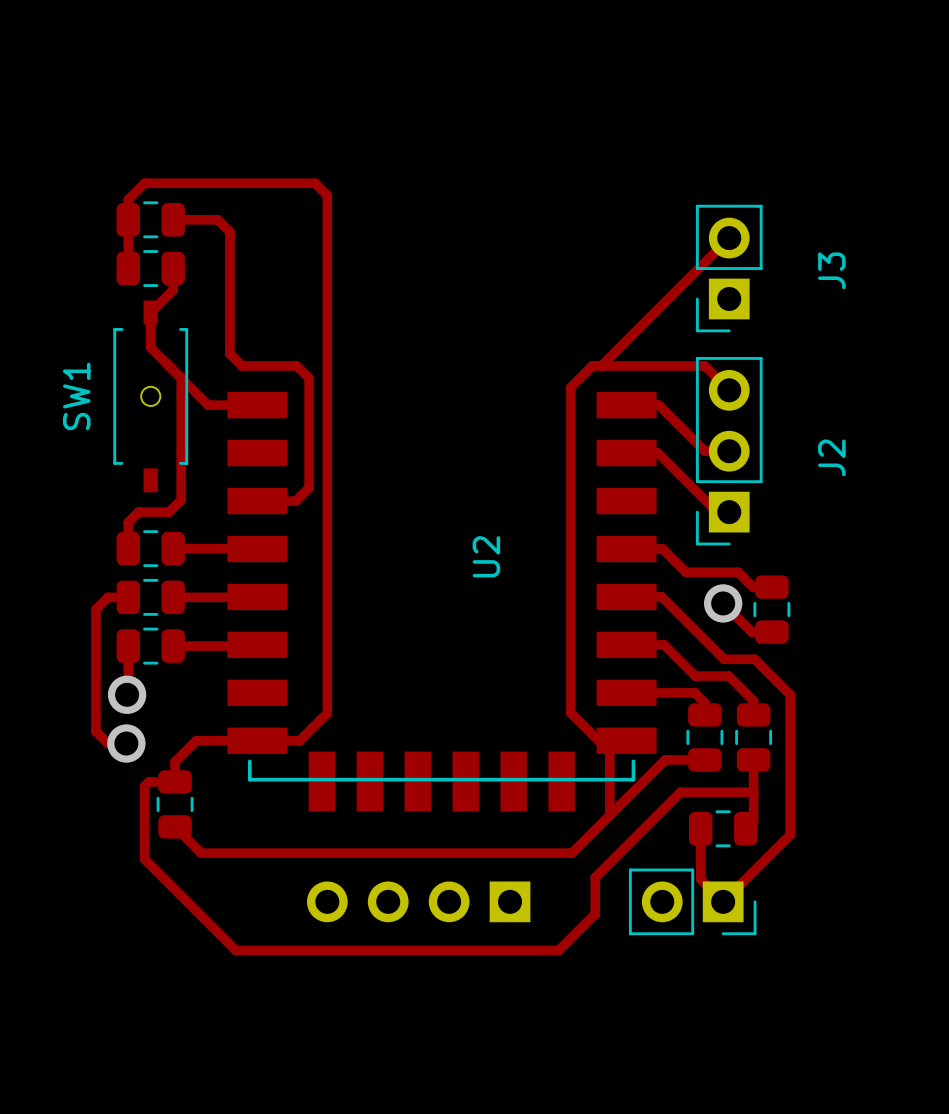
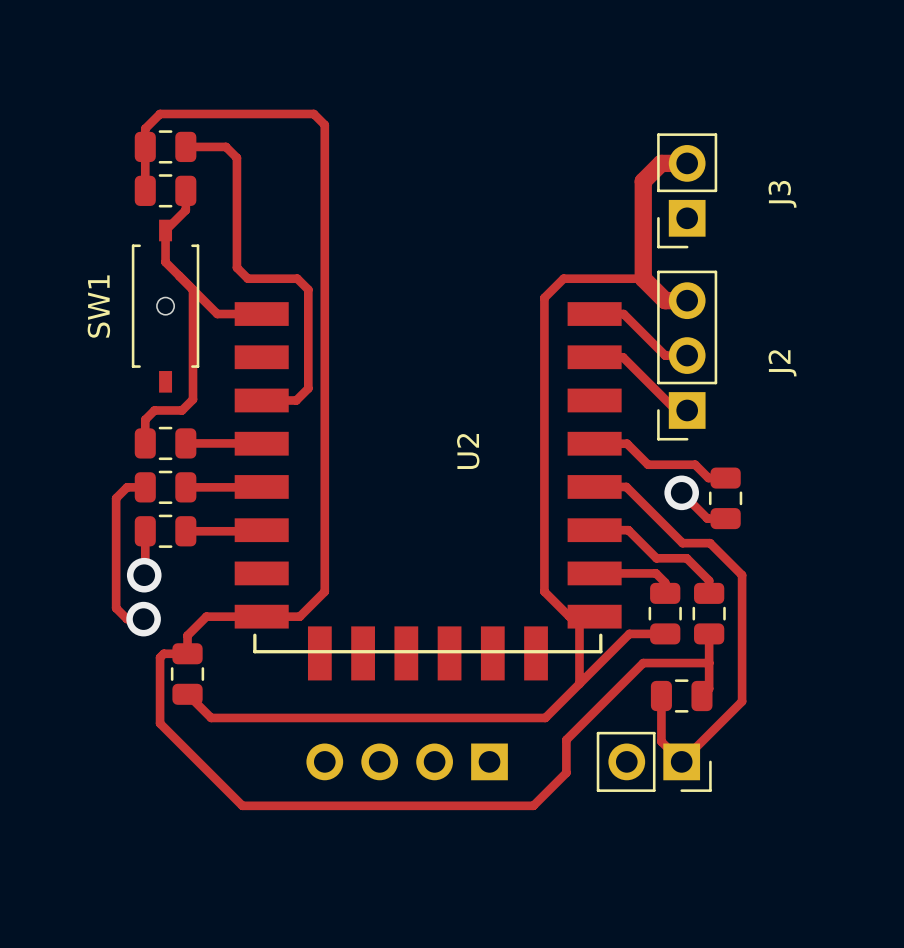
track: (729, 238) (601, 365) -> (687, 163) (661, 163) (643, 181) (643, 278) (665, 300) (687, 300)
track: (680, 365) (704, 365) (729, 390) -> none

